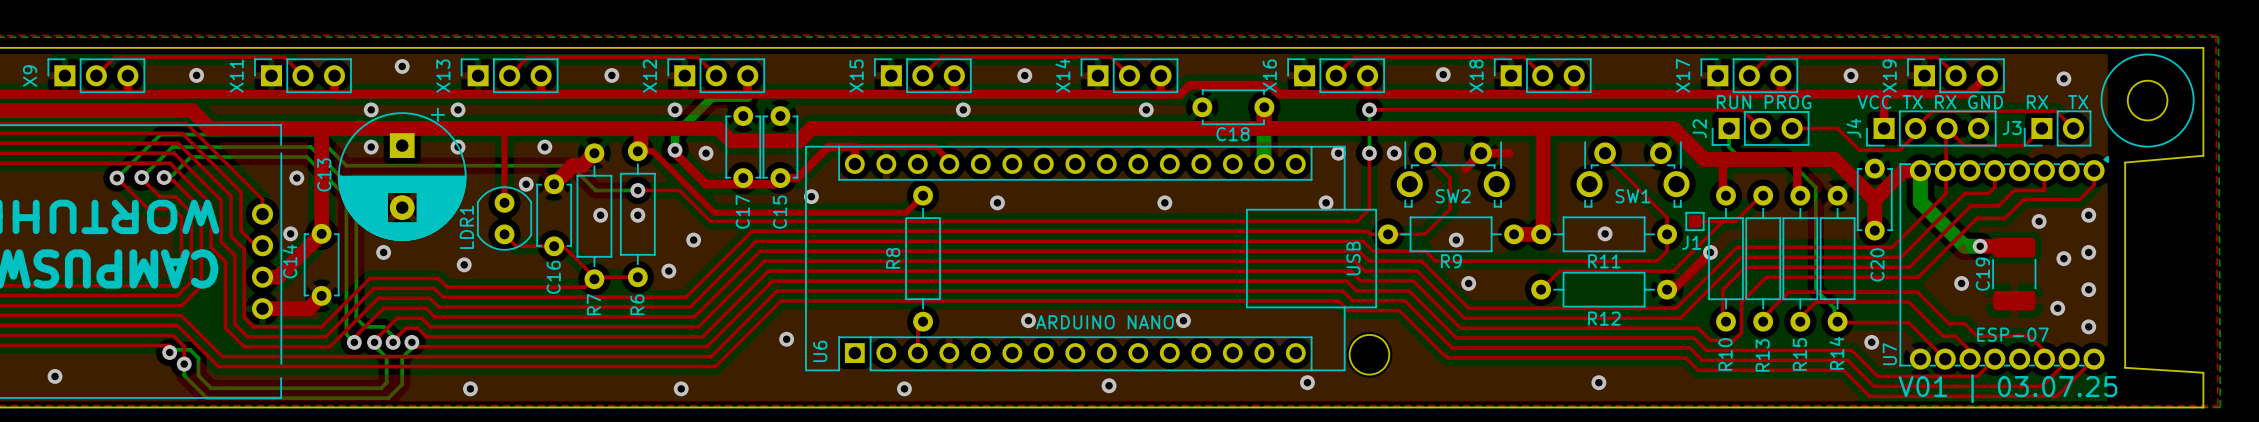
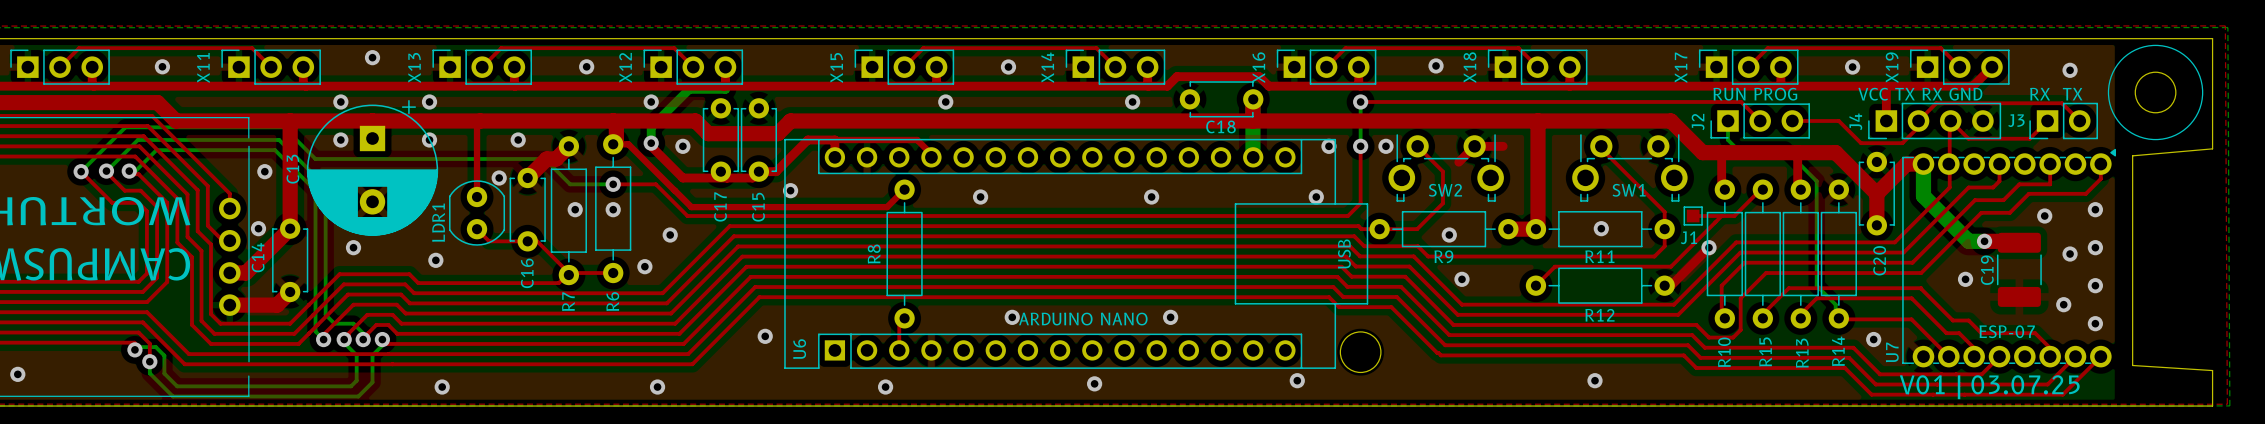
R15 name position: R15 (1799, 354) -> R15 (1765, 351)
R13 name position: R13 (1762, 355) -> R13 (1802, 353)

